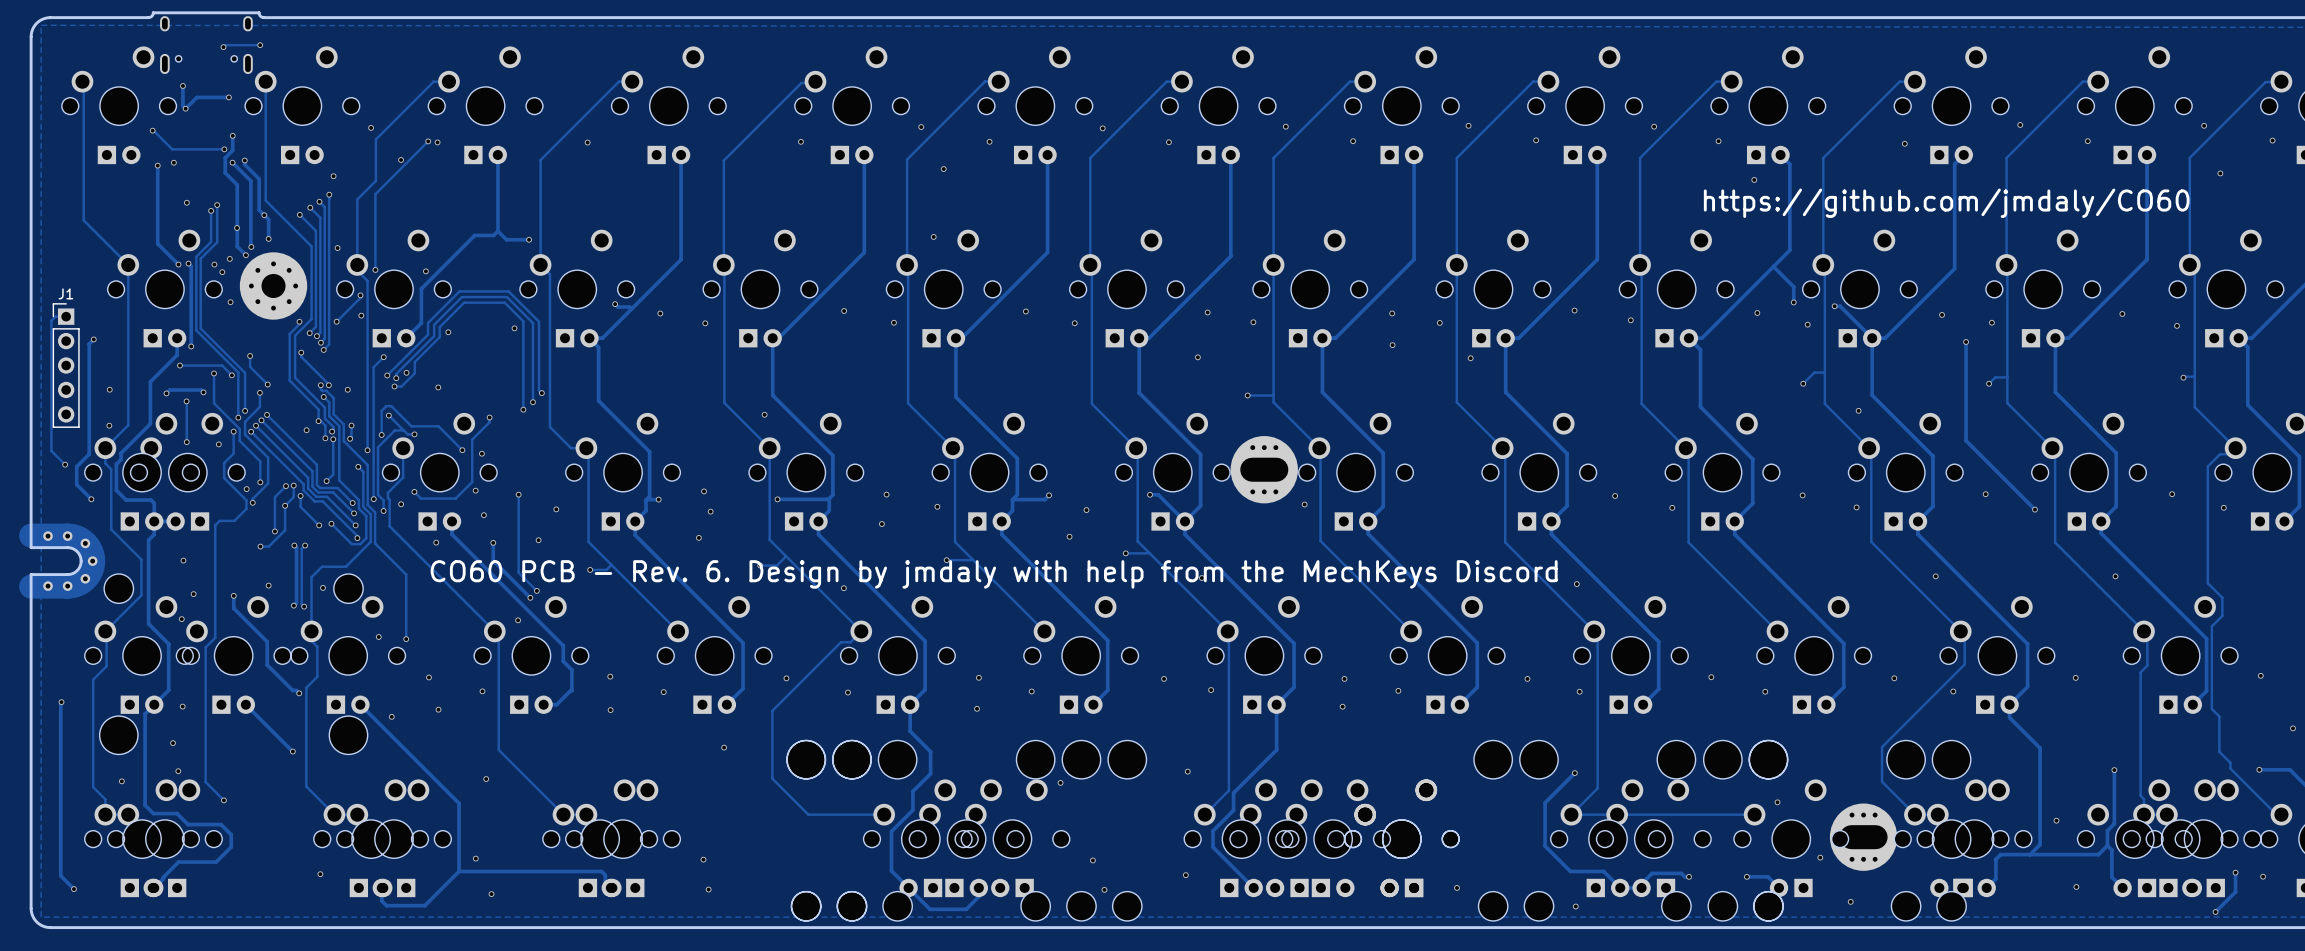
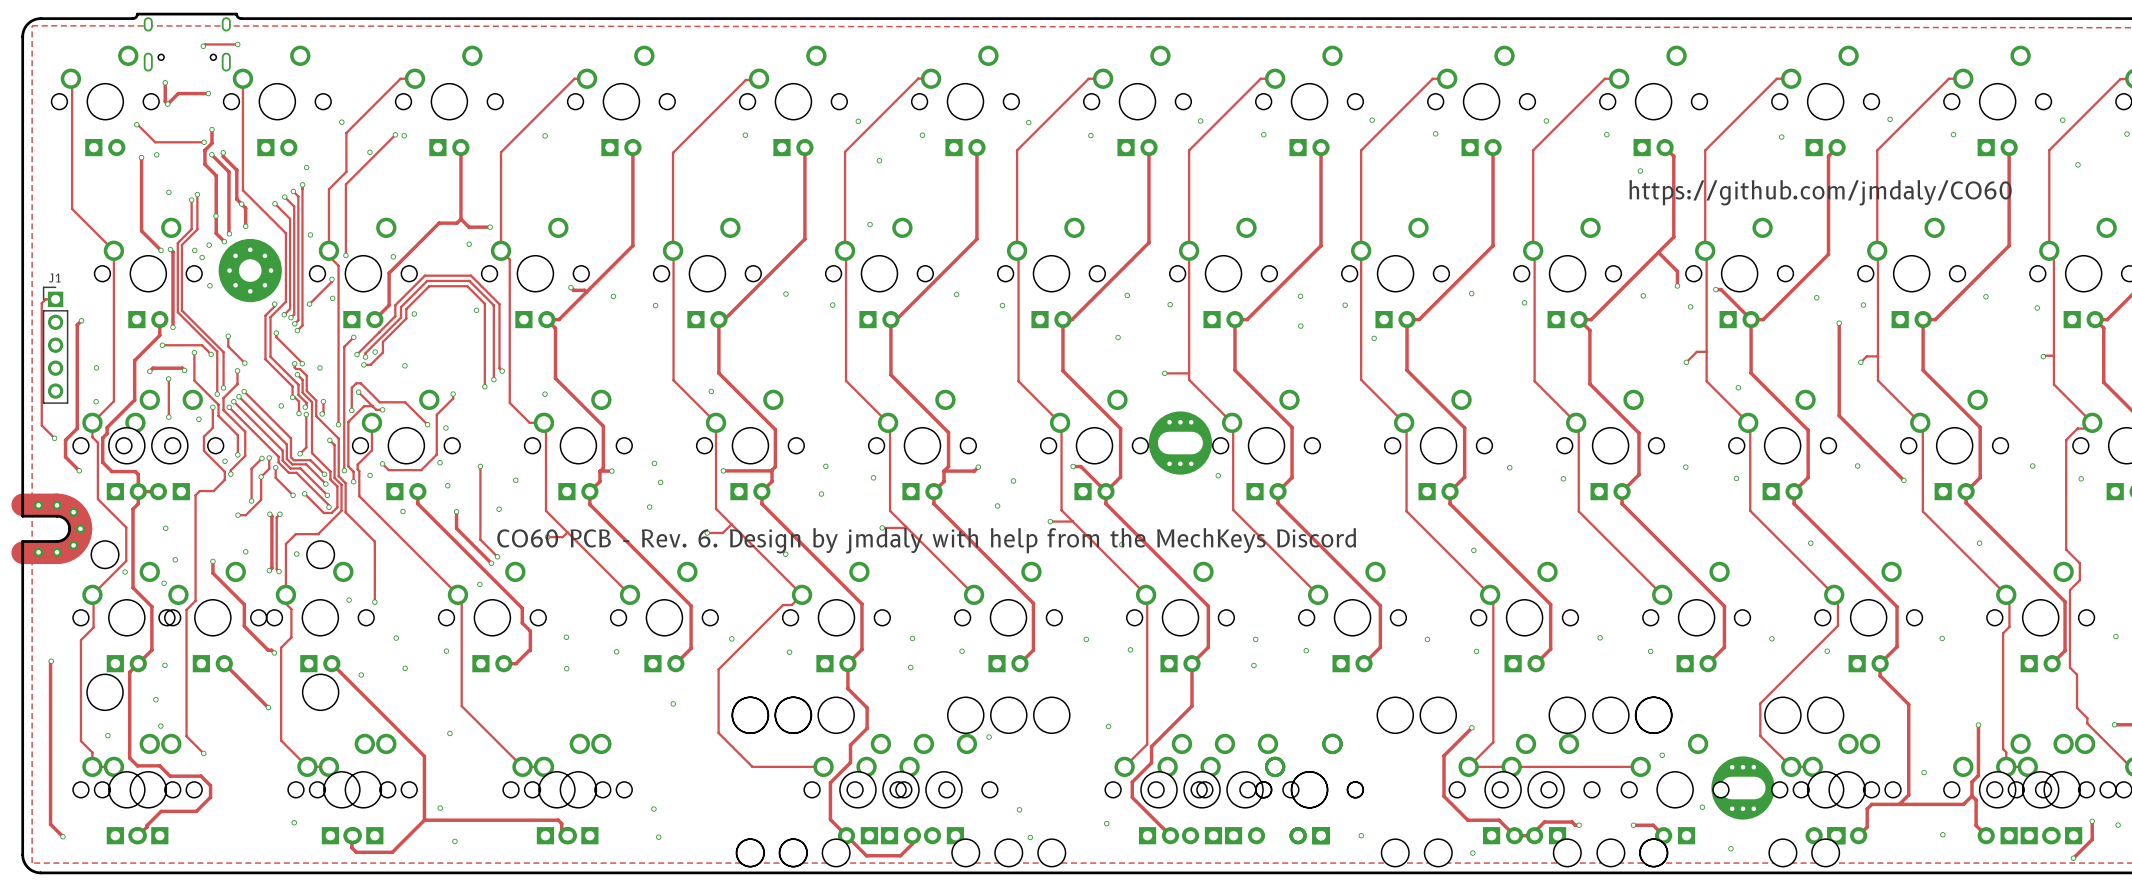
via: none -> (469, 244)
via: none -> (545, 394)
via: none -> (125, 572)

